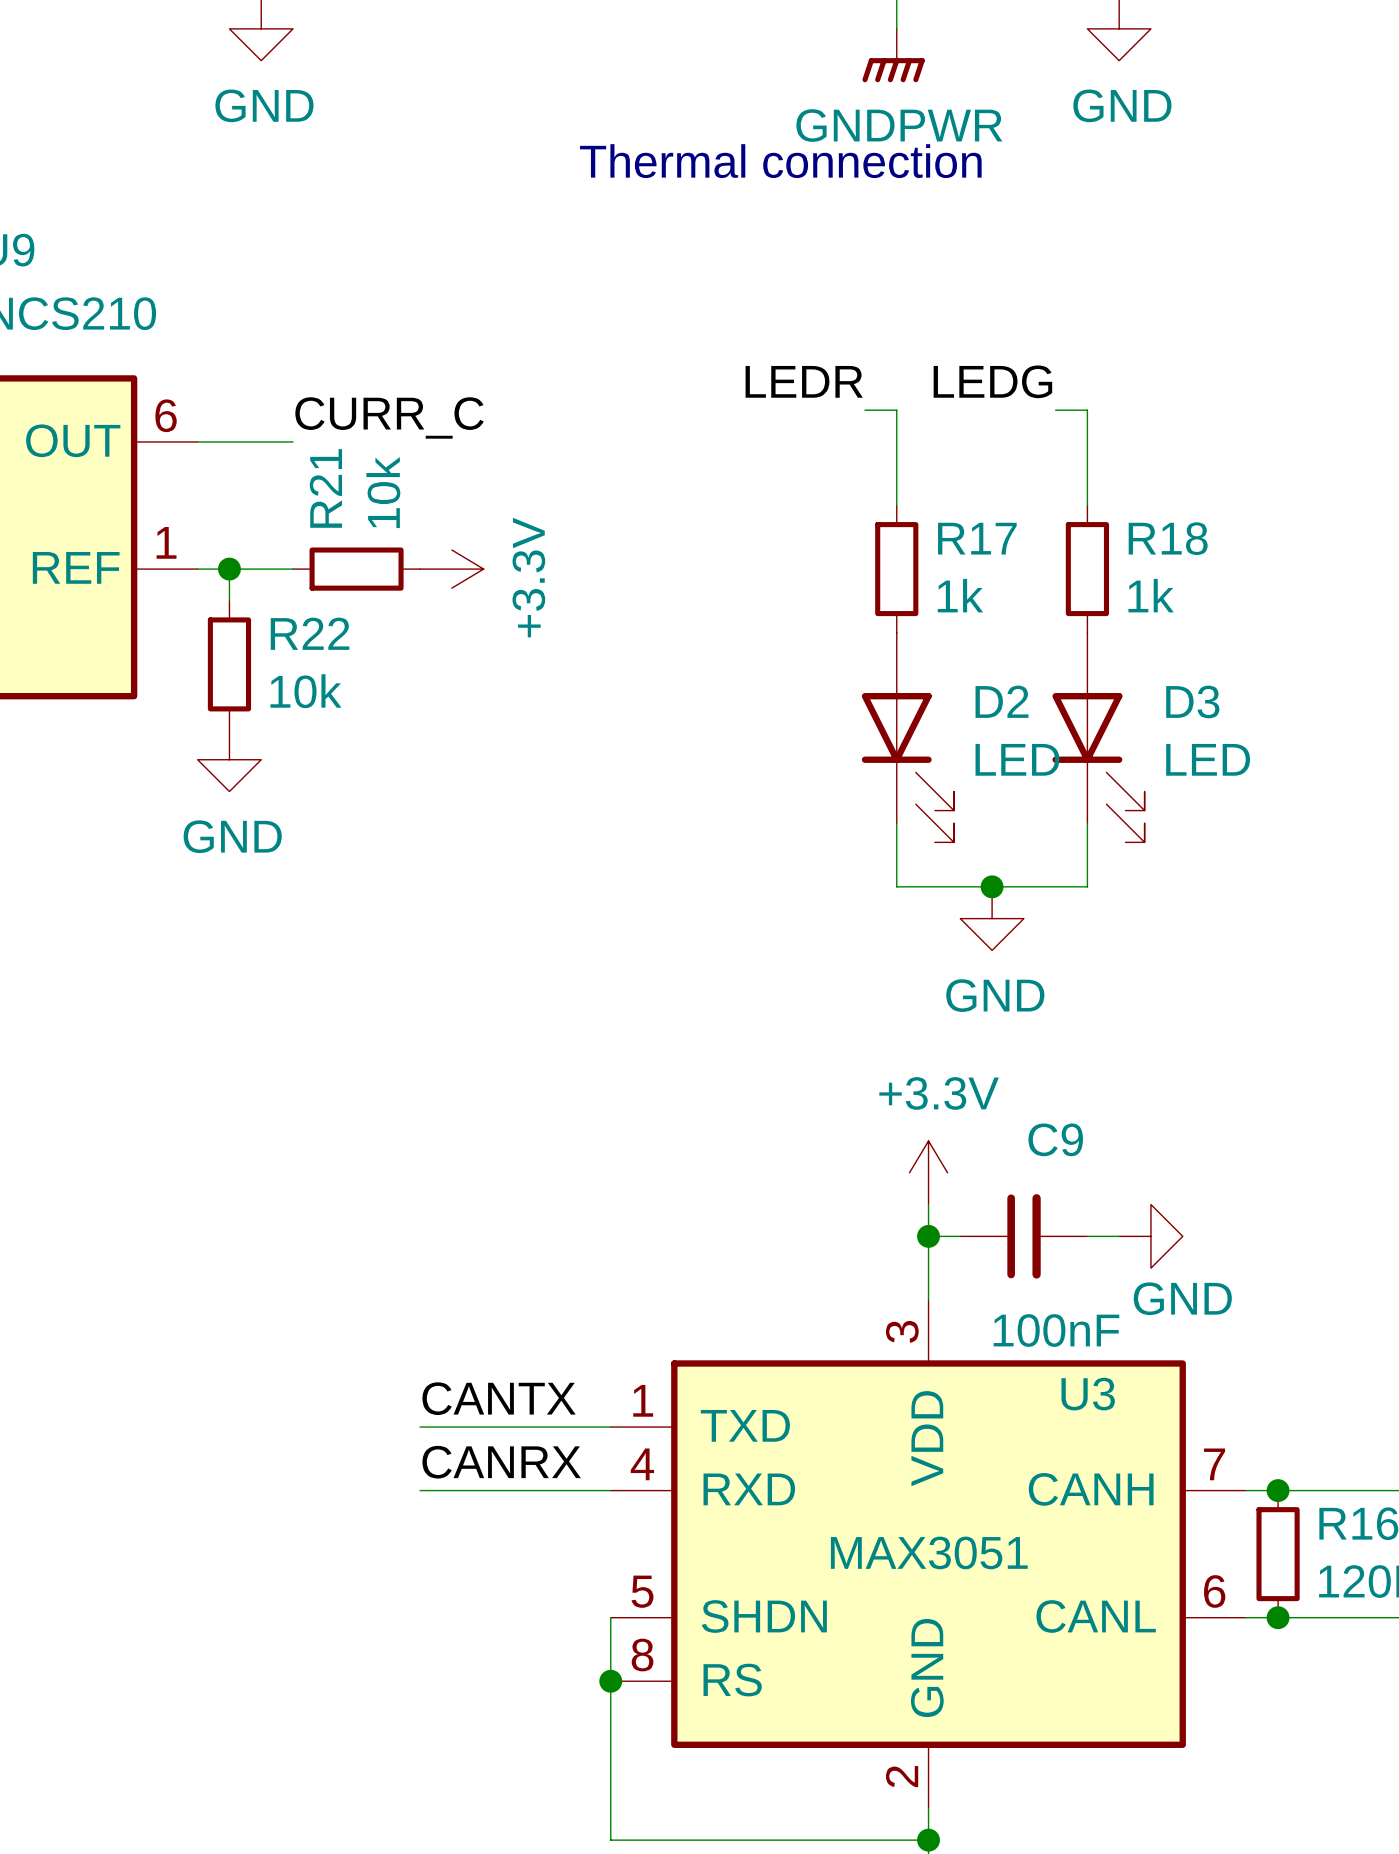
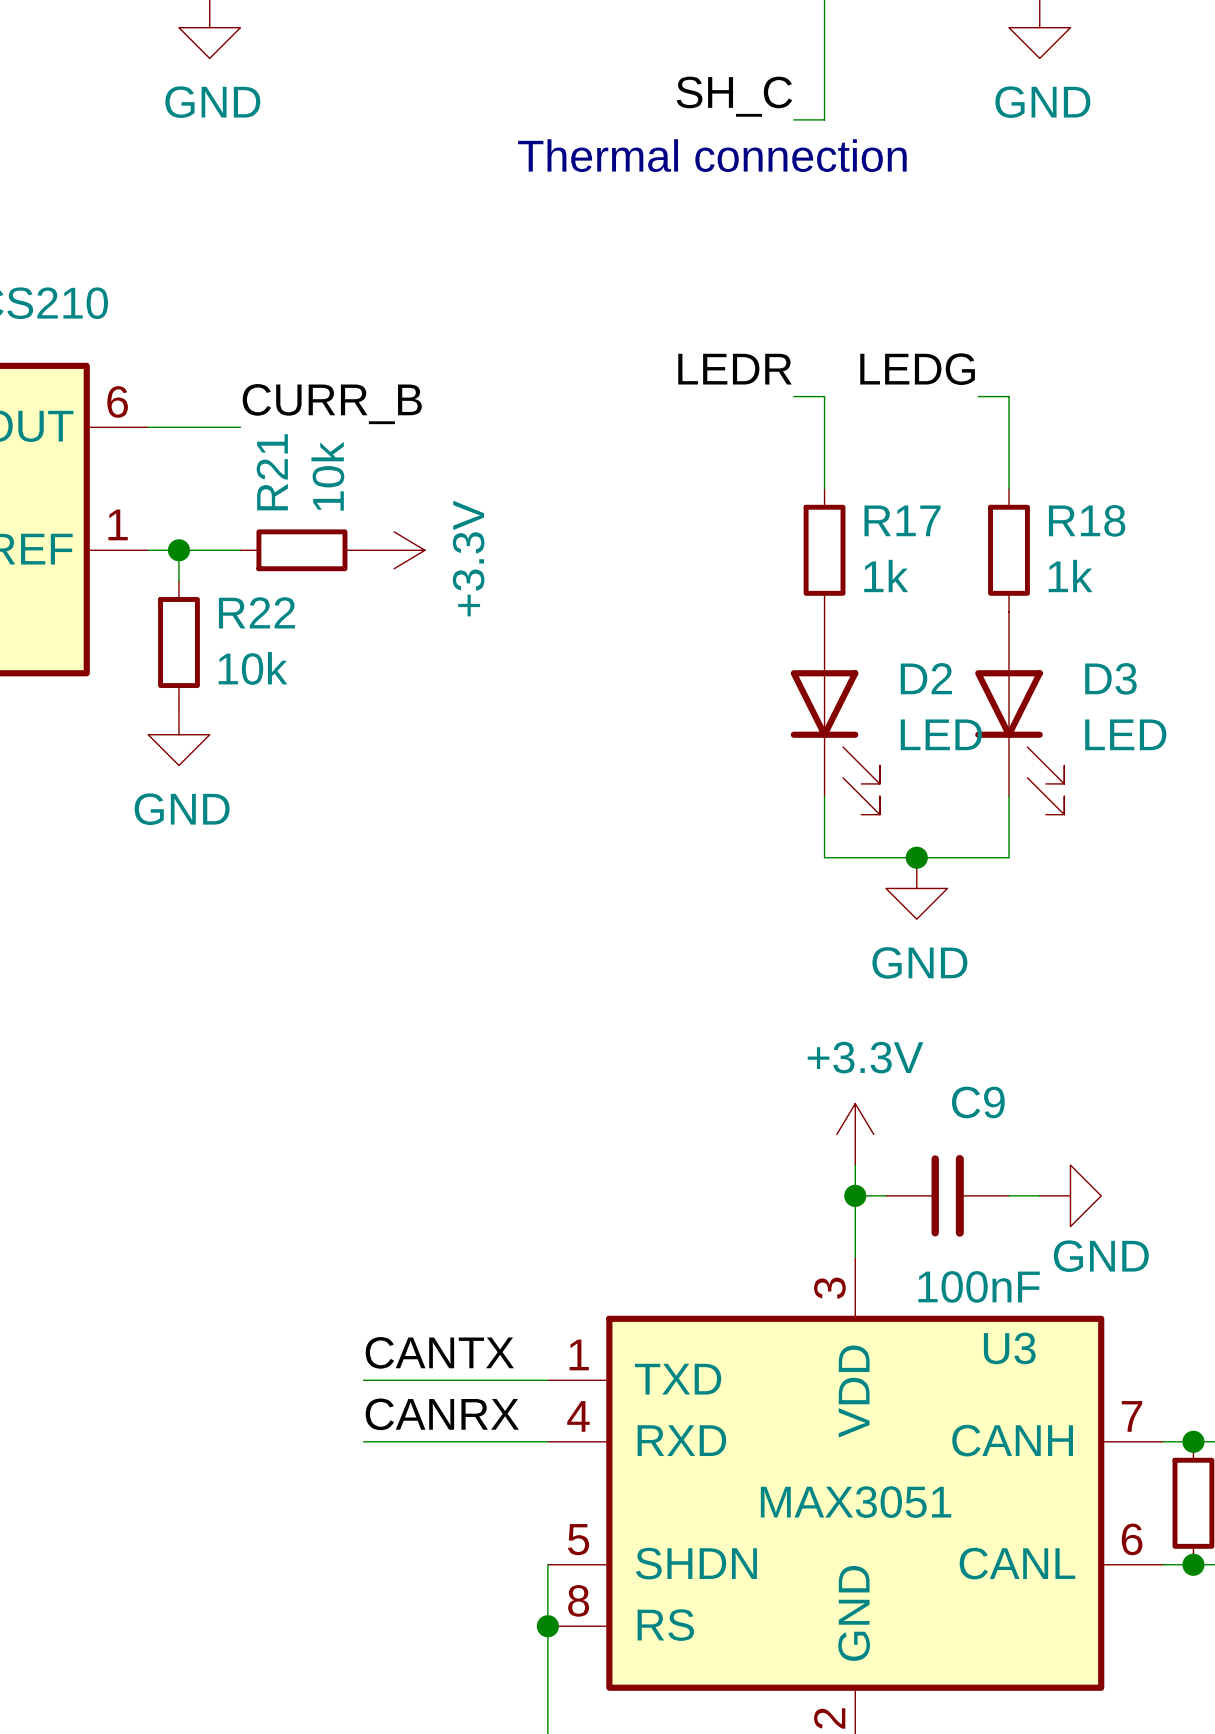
wire: none -> (824, 27) (824, 119) (793, 119)
power symbol: GNDPWR (893, 55) -> none
label: none -> SH_C (734, 96)
label: CURR_C (389, 417) -> CURR_B (332, 404)

